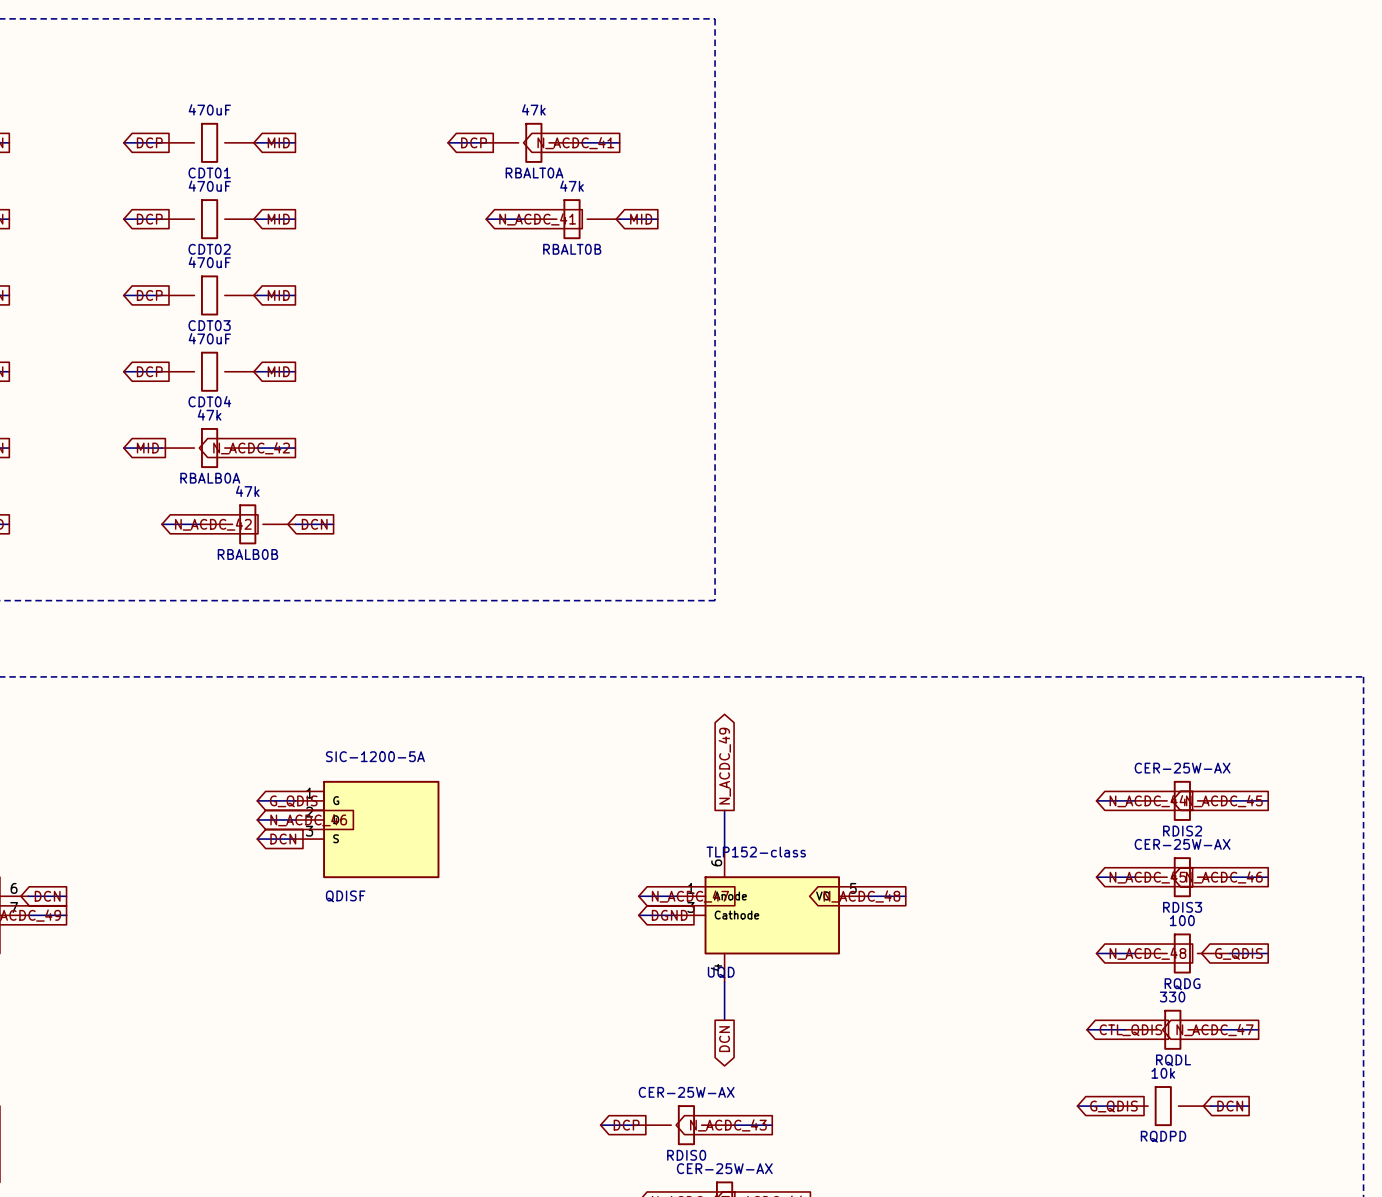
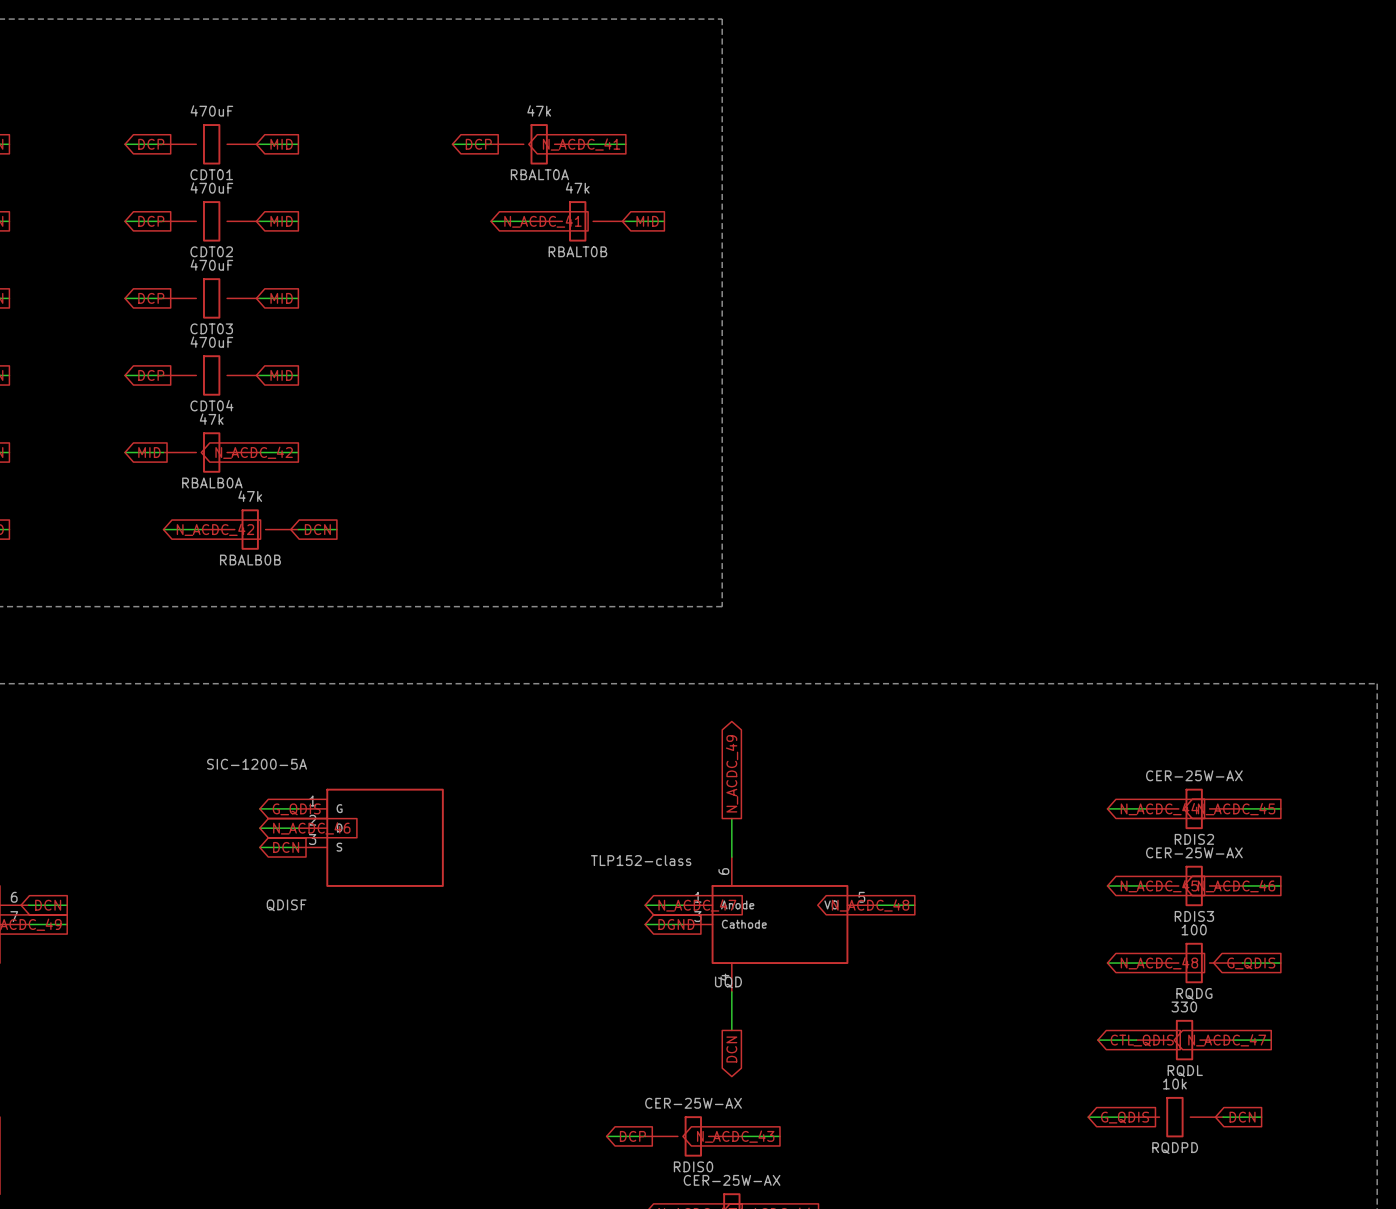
QDISF value position: SIC-1200-5A (375, 756) -> SIC-1200-5A (257, 764)
UQD value position: TLP152-class (756, 852) -> TLP152-class (641, 860)
QDISF name position: QDISF (345, 896) -> QDISF (286, 905)

